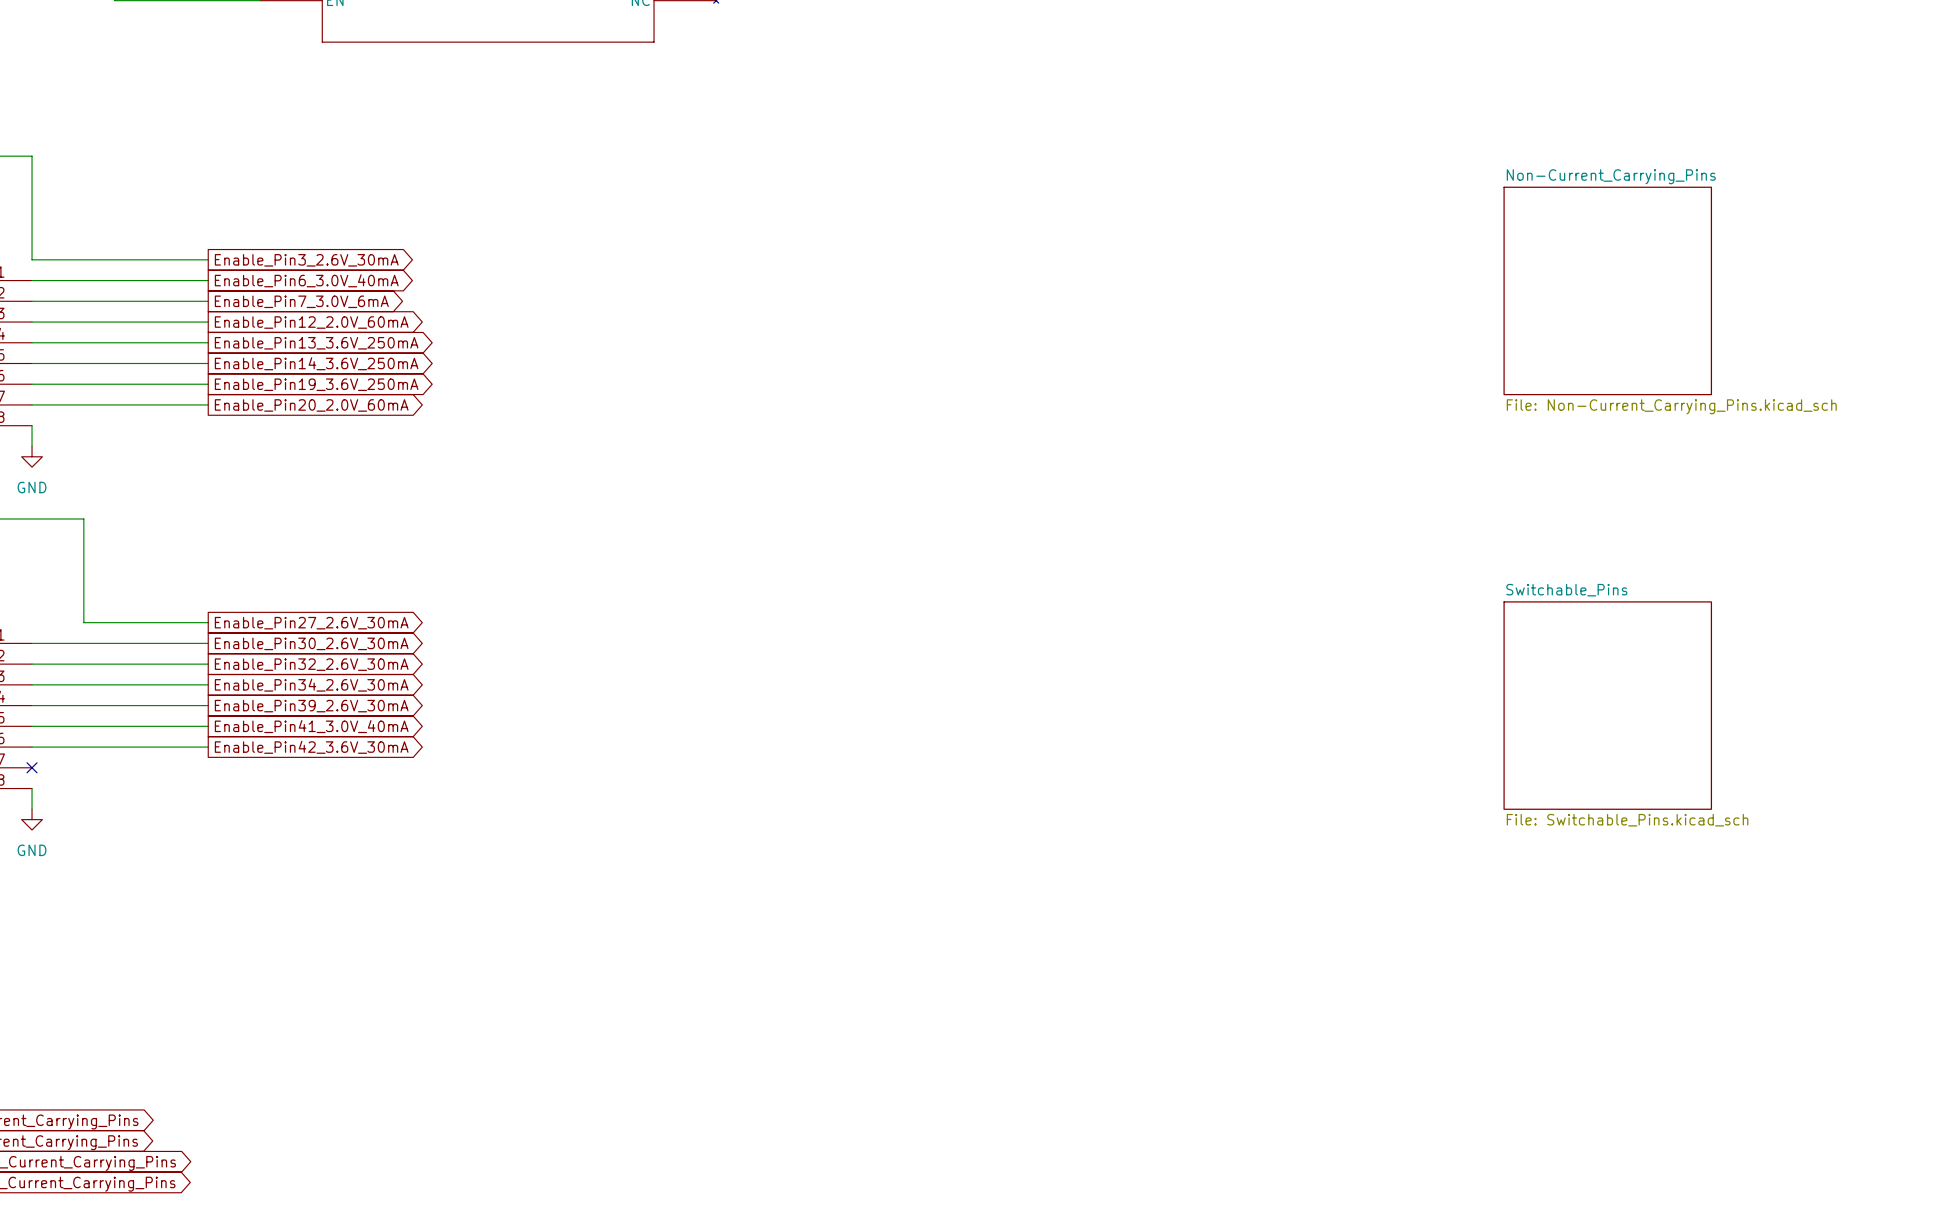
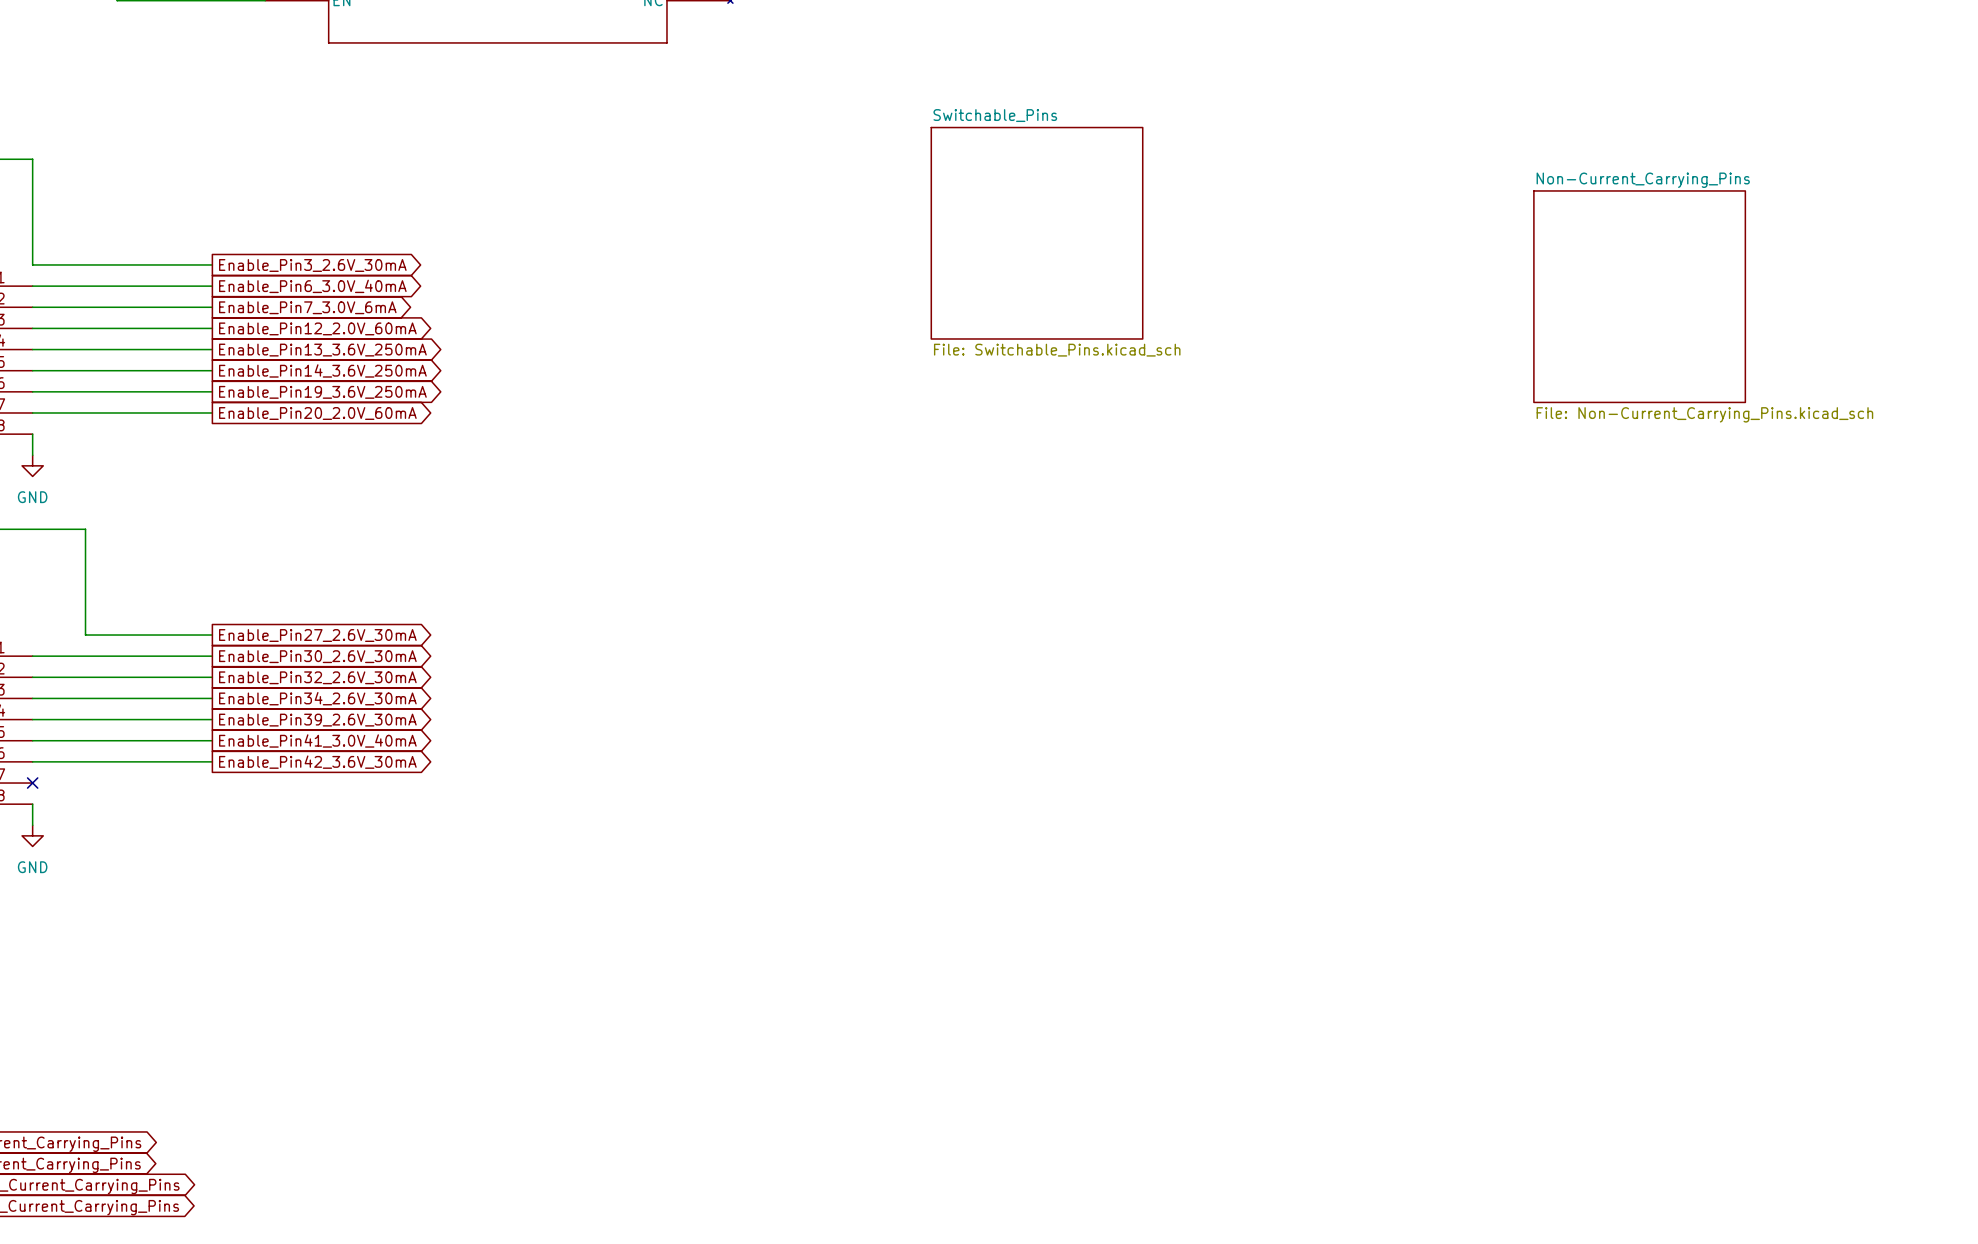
sheet Switchable_Pins: none -> File: Switchable_Pins.kicad_sch (1037, 233)
sheet Switchable_Pins: File: Switchable_Pins.kicad_sch (1607, 705) -> none

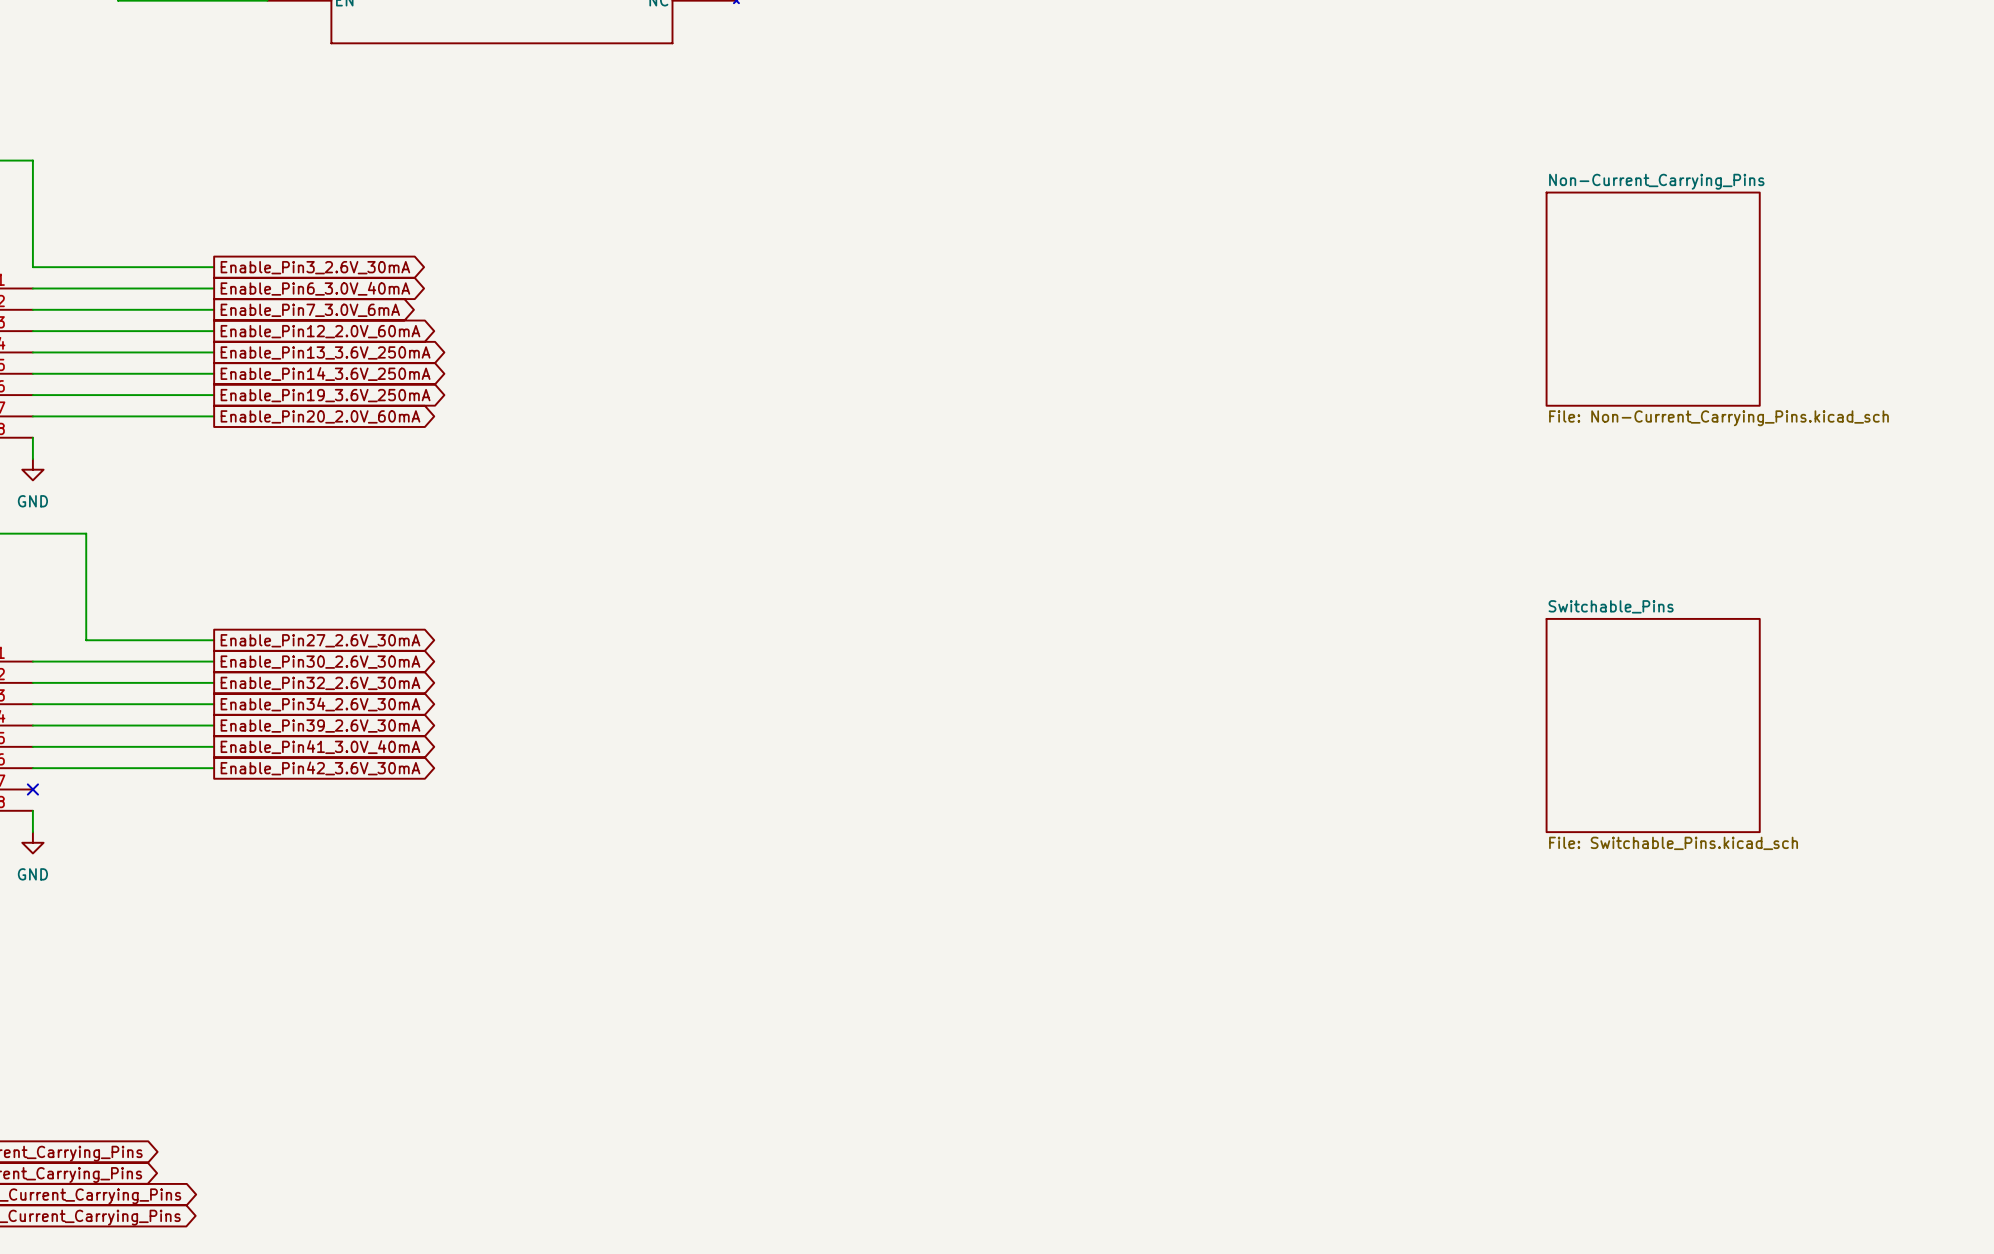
sheet Switchable_Pins: File: Switchable_Pins.kicad_sch (1037, 233) -> none
sheet Switchable_Pins: none -> File: Switchable_Pins.kicad_sch (1653, 725)

